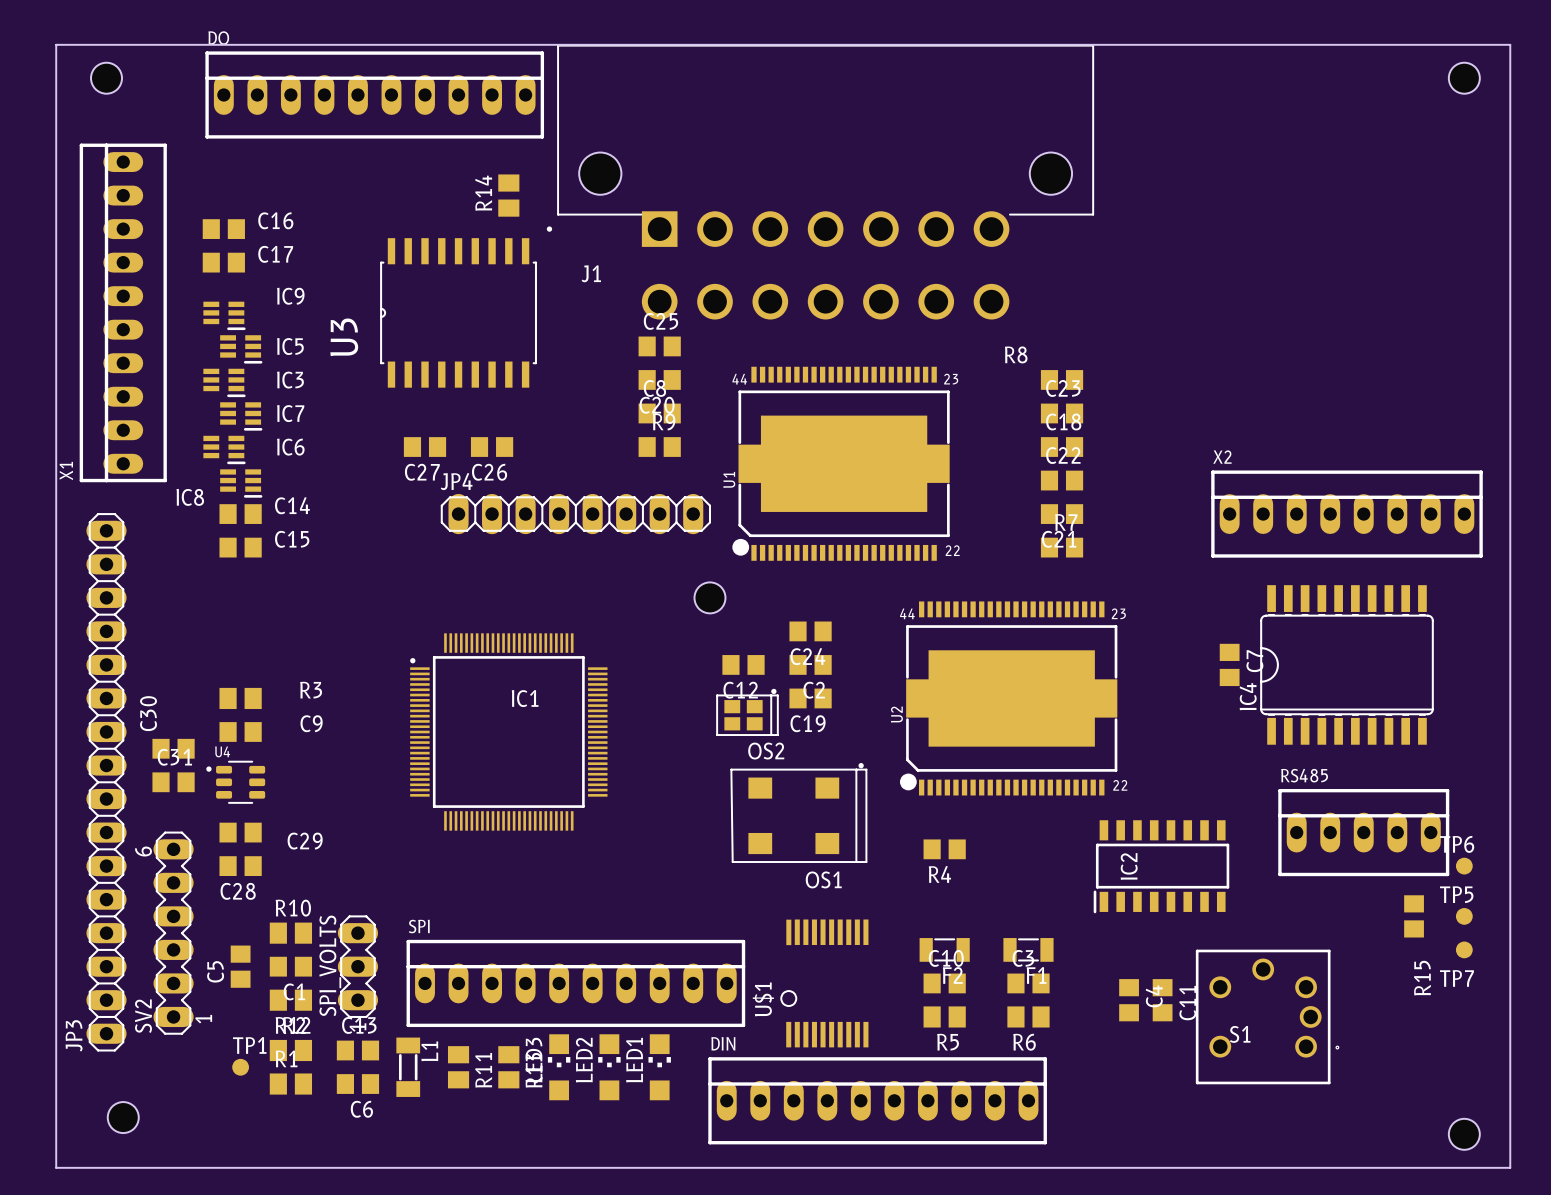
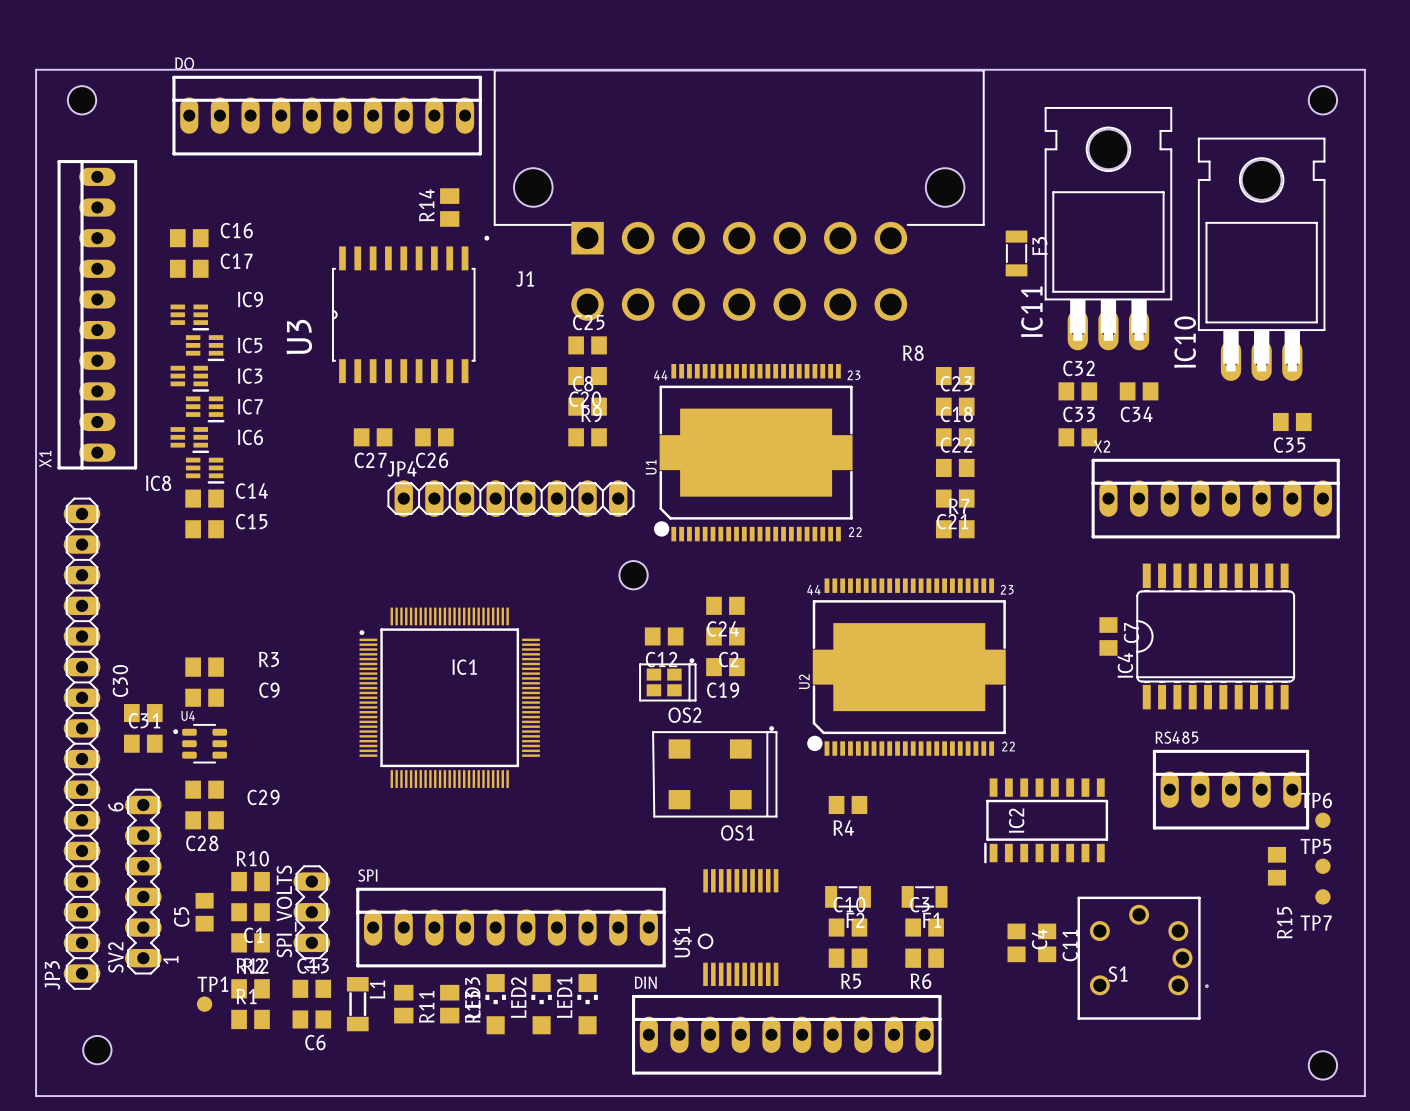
IC11: none -> (1108, 228)
F3: none -> (1016, 253)
IC10: none -> (1261, 259)
C32: none -> (1077, 391)
C34: none -> (1139, 391)
C35: none -> (1292, 422)
C33: none -> (1077, 437)

